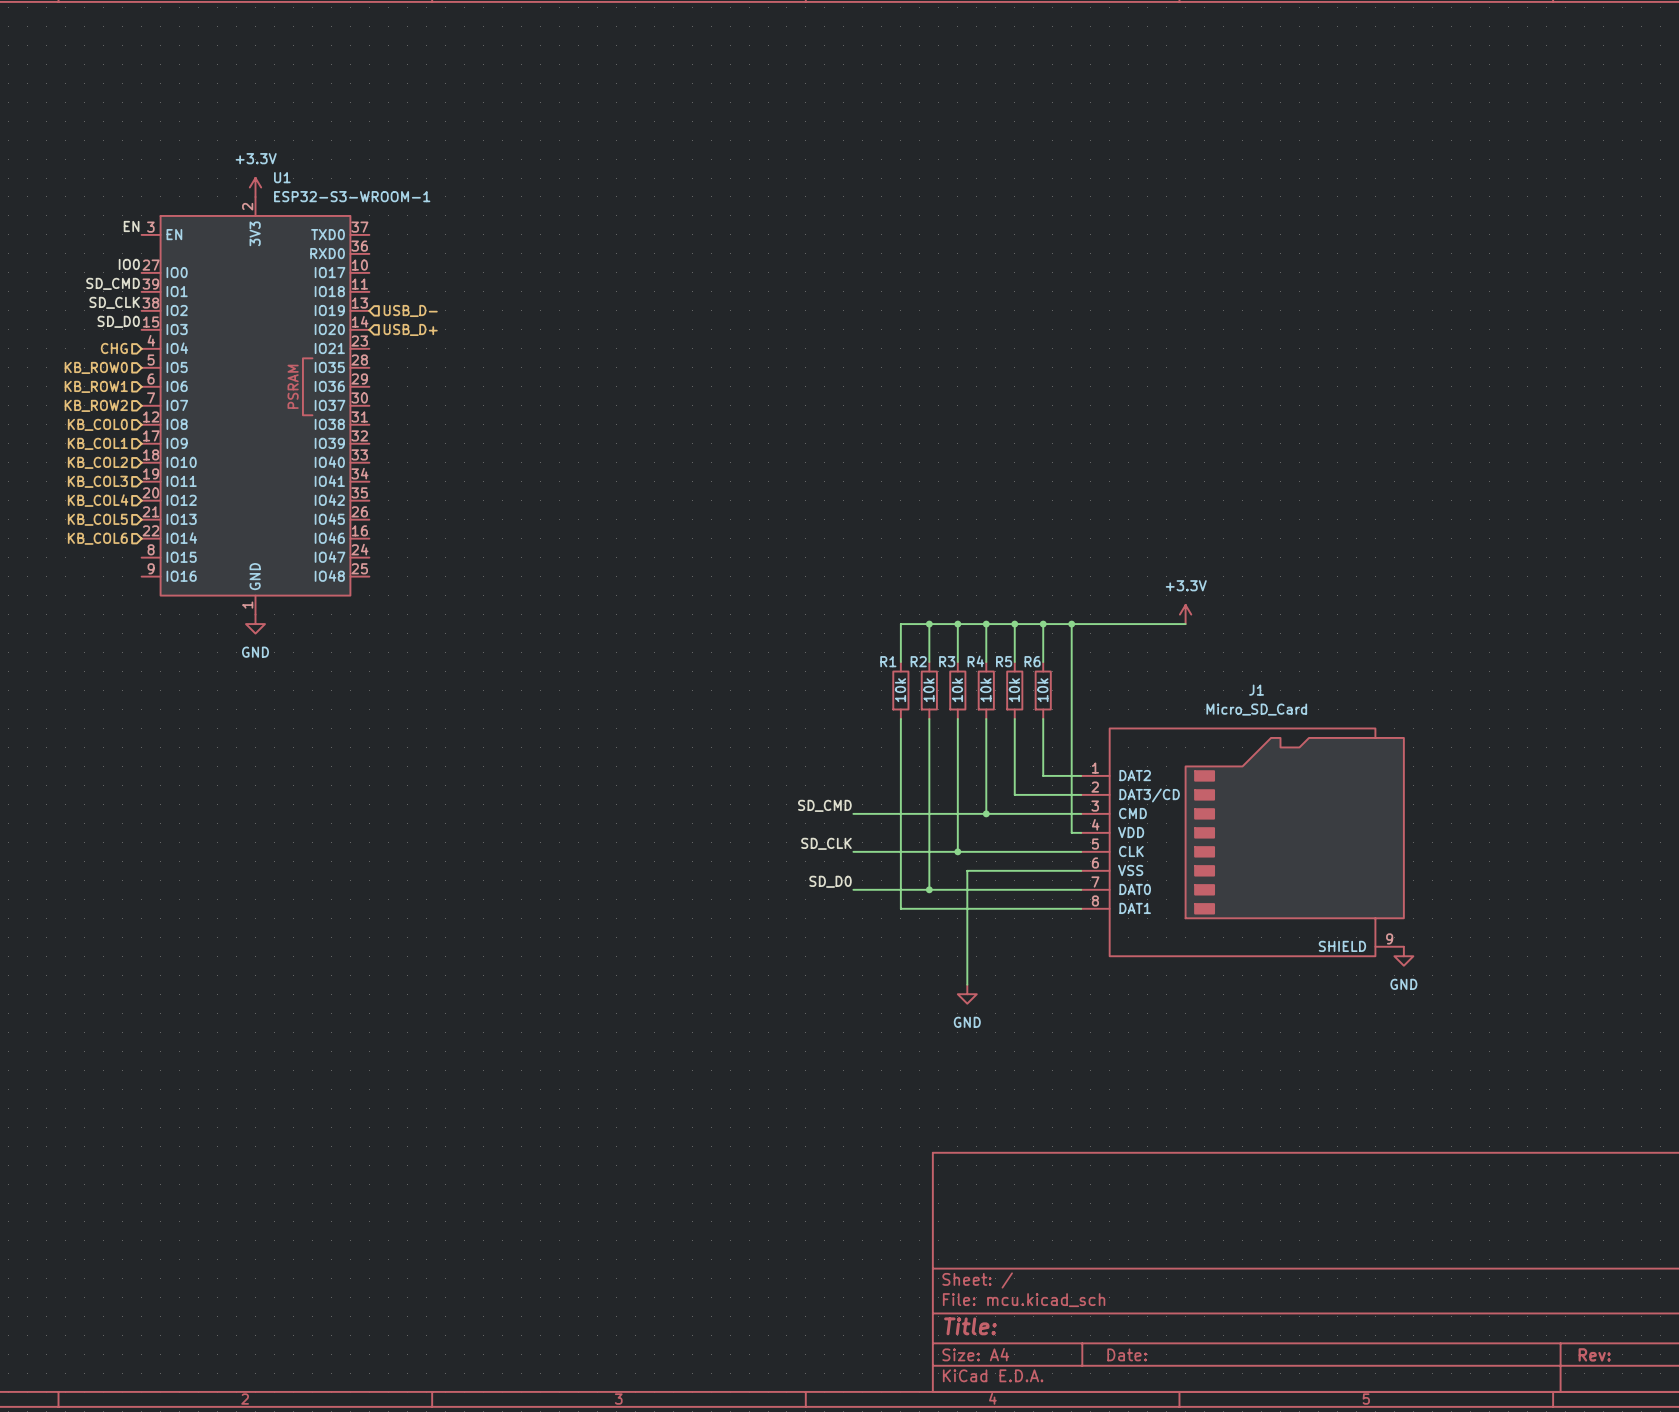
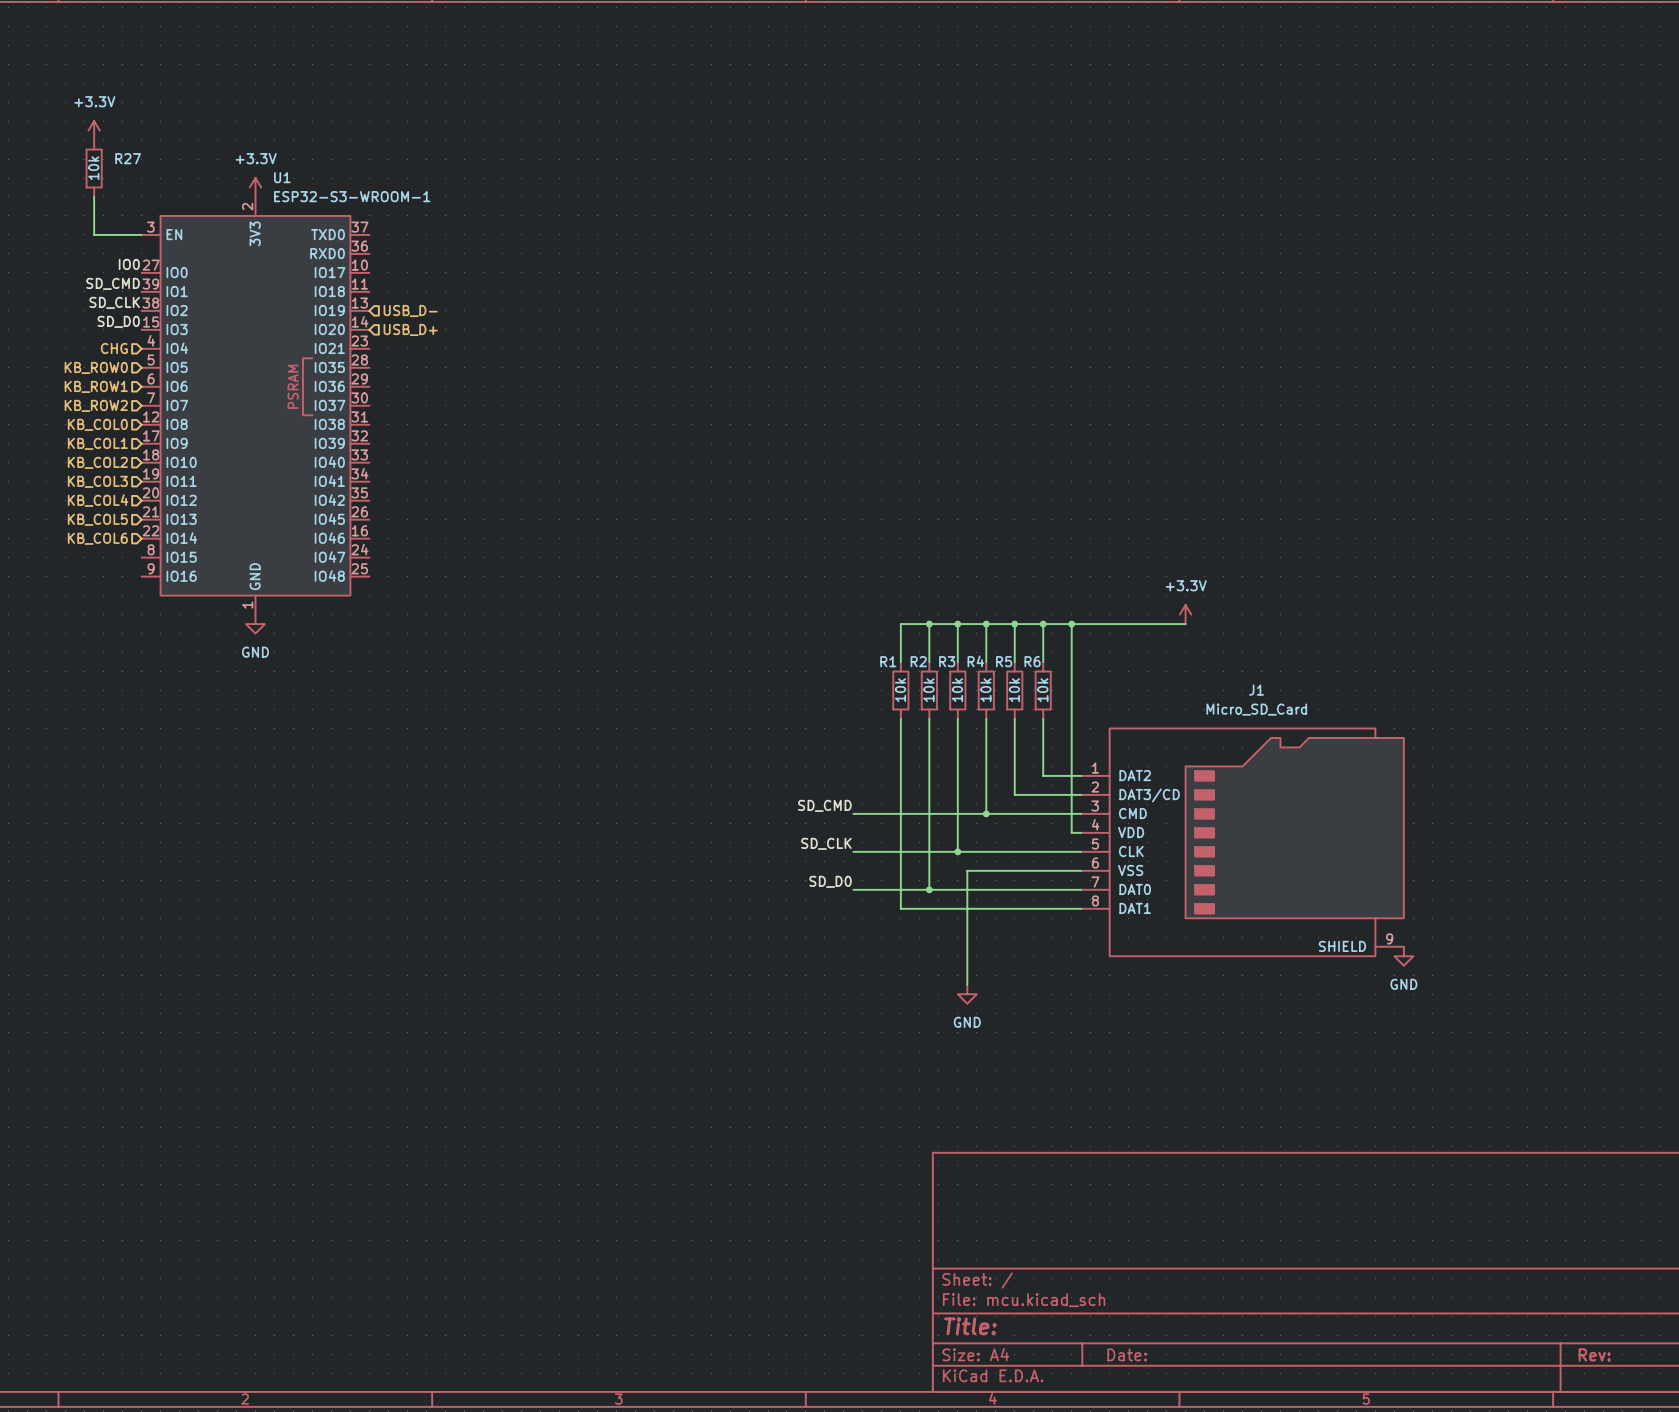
power symbol: none -> +3.3V (94, 130)
R27: none -> 10k (94, 168)
wire: none -> (94, 196) (94, 234) (141, 234)
label: EN (131, 226) -> none

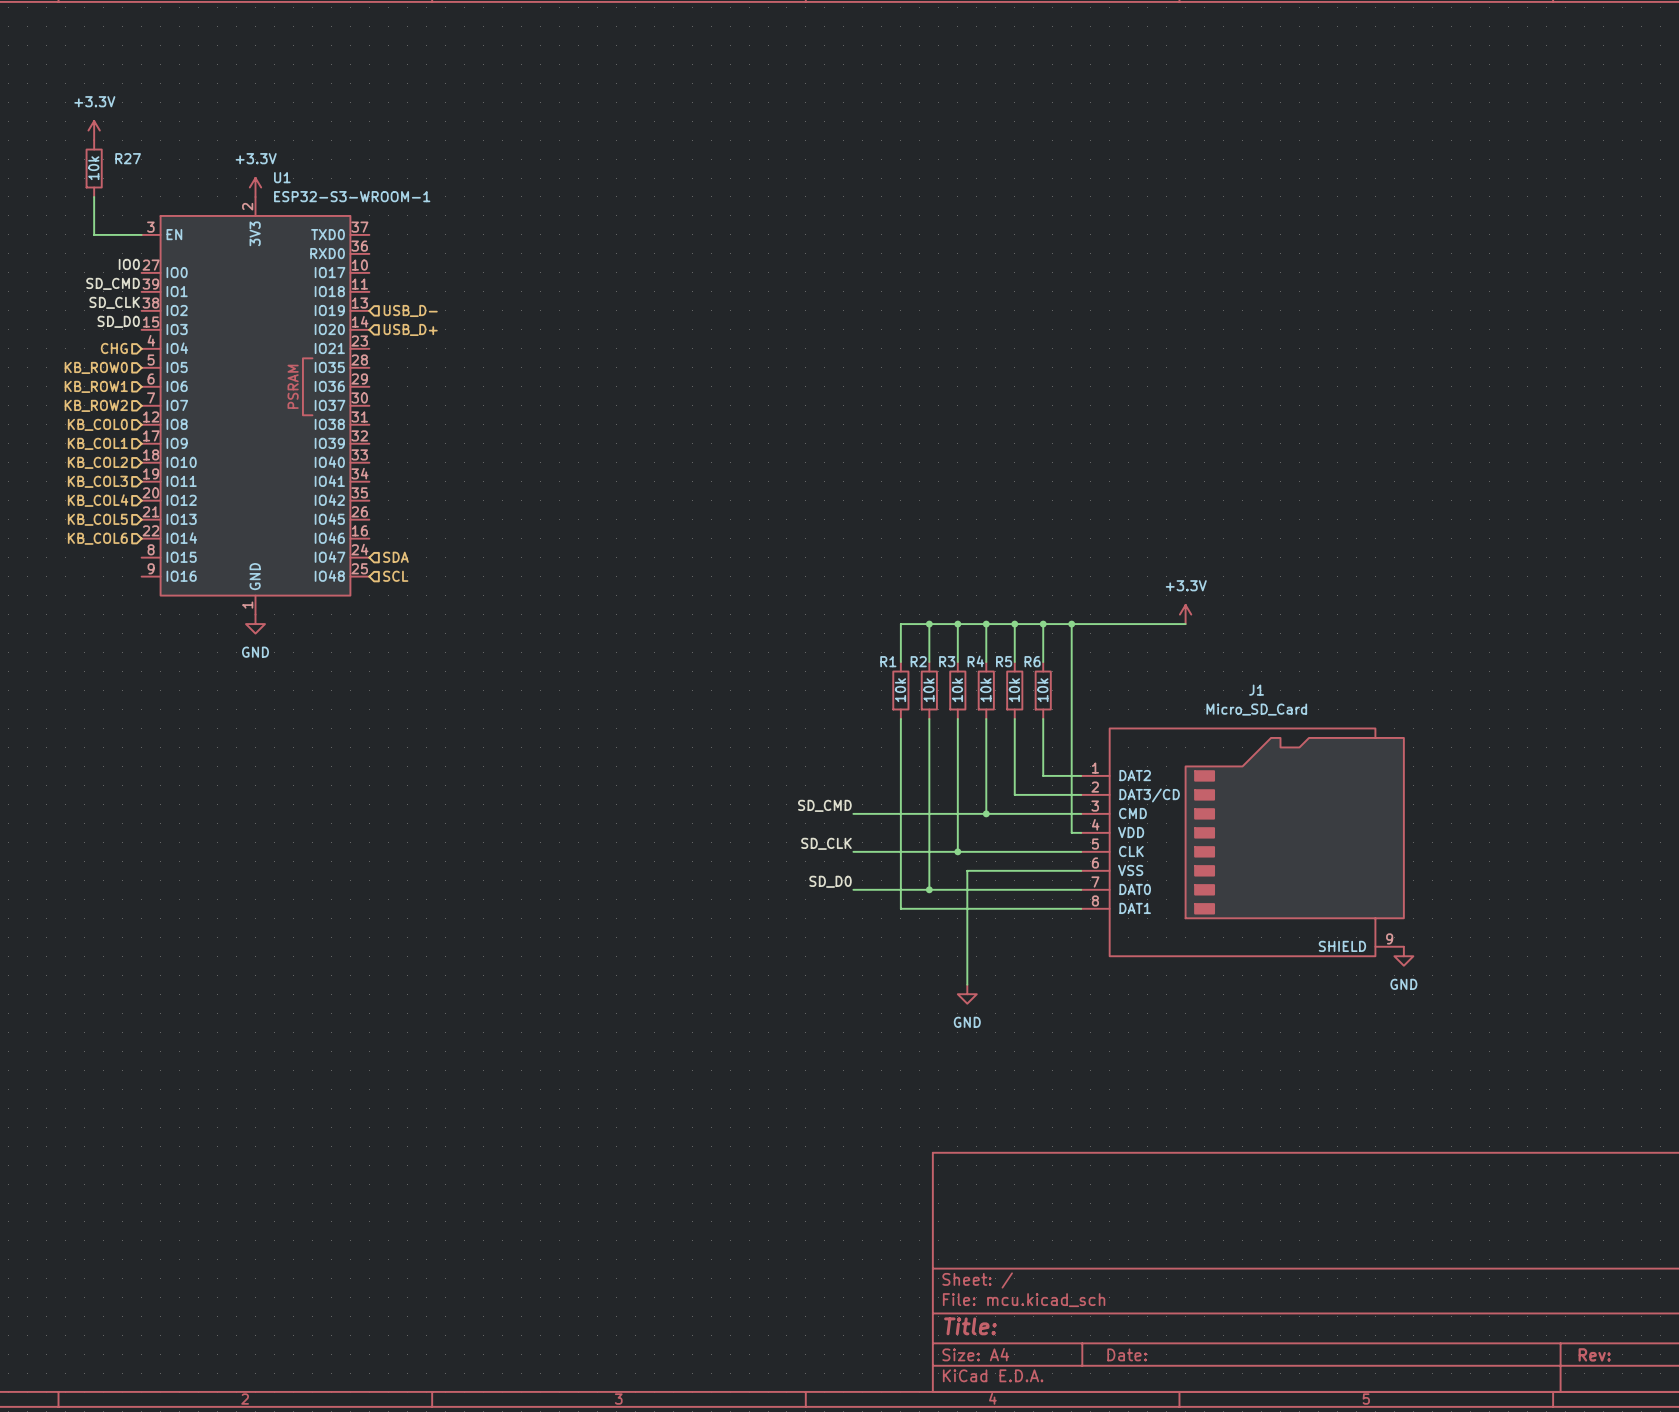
hierarchical label: none -> SDA (395, 557)
hierarchical label: none -> SCL (395, 576)

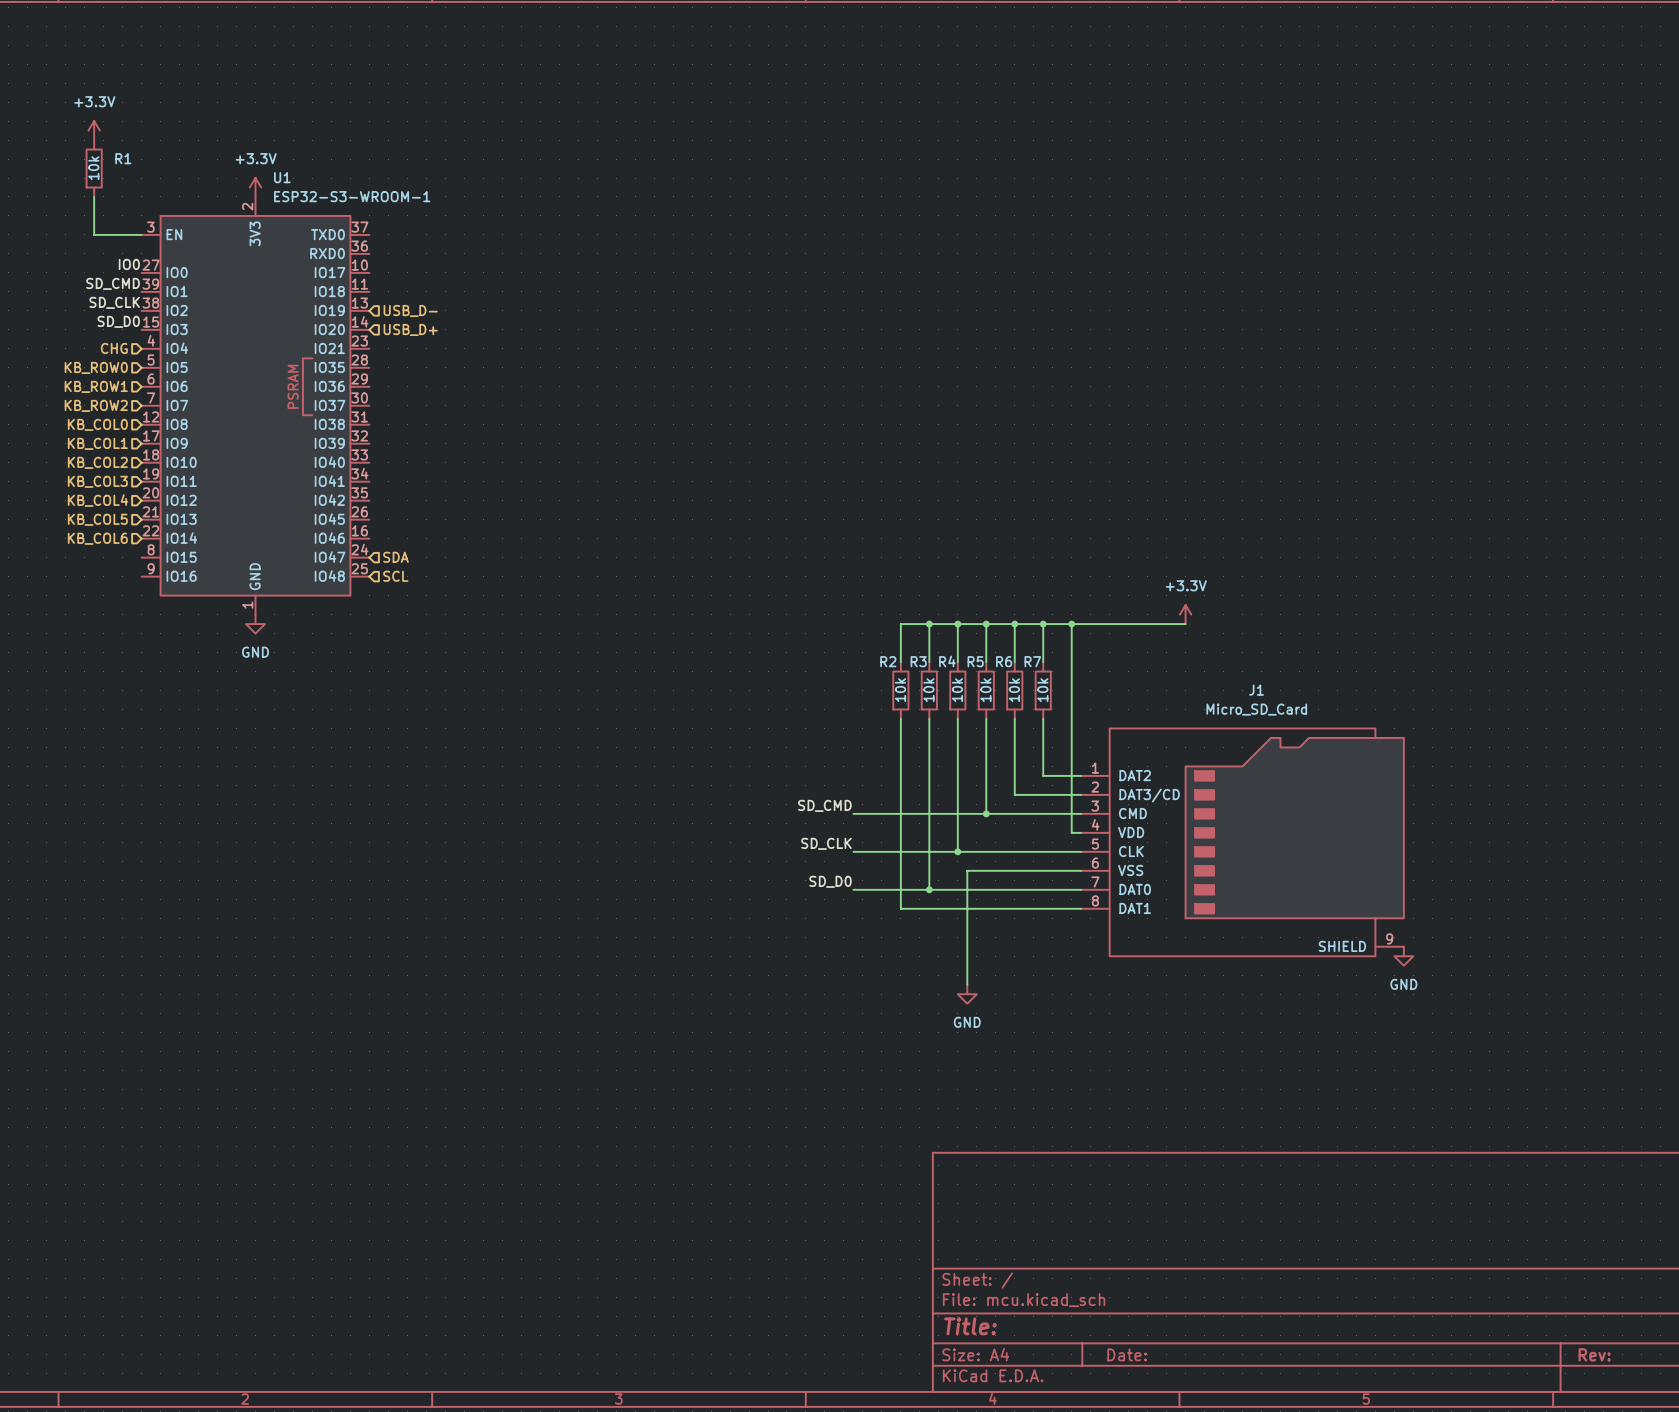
R27 name: R27 (128, 158) -> R1 (123, 158)
R1 name: R1 (888, 661) -> R2 (888, 661)
R2 name: R2 (918, 661) -> R3 (918, 661)
R3 name: R3 (947, 661) -> R4 (947, 661)
R4 name: R4 (975, 661) -> R5 (975, 661)
R5 name: R5 (1004, 661) -> R6 (1004, 661)
R6 name: R6 (1032, 661) -> R7 (1032, 661)

